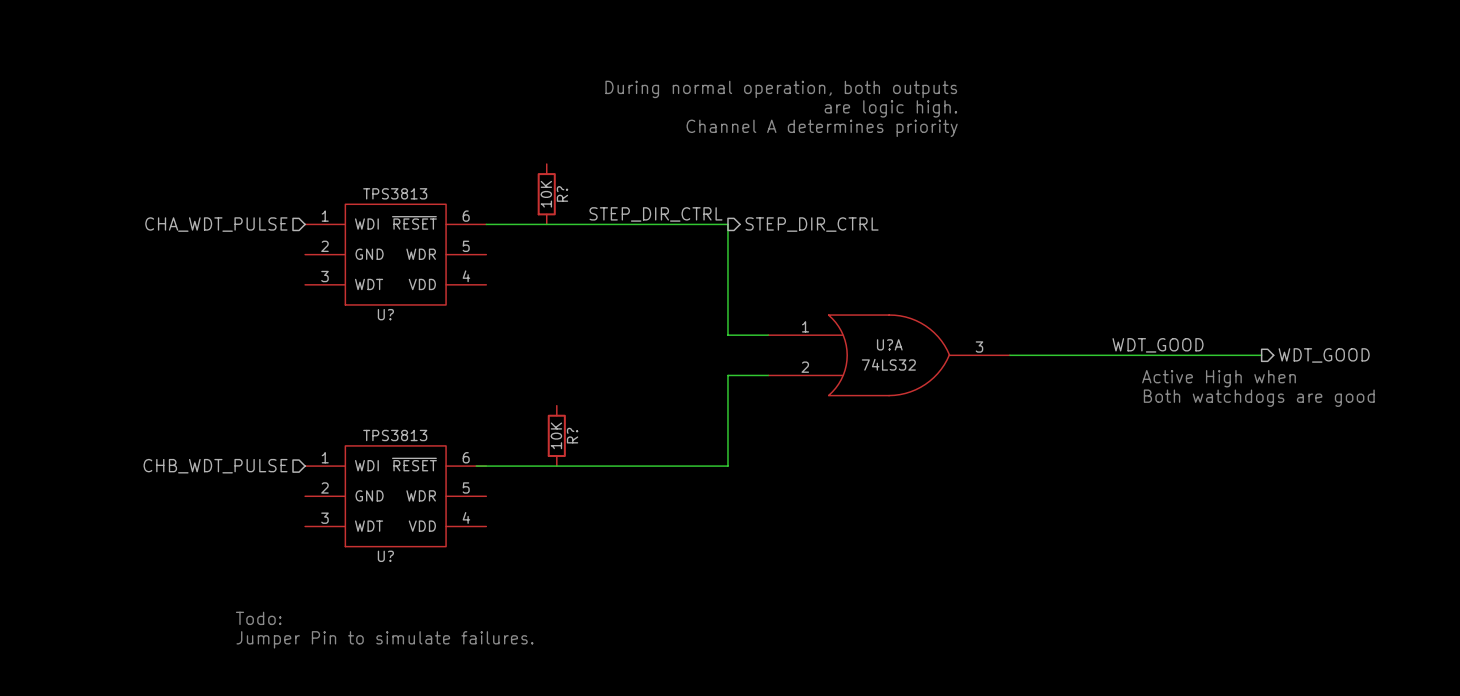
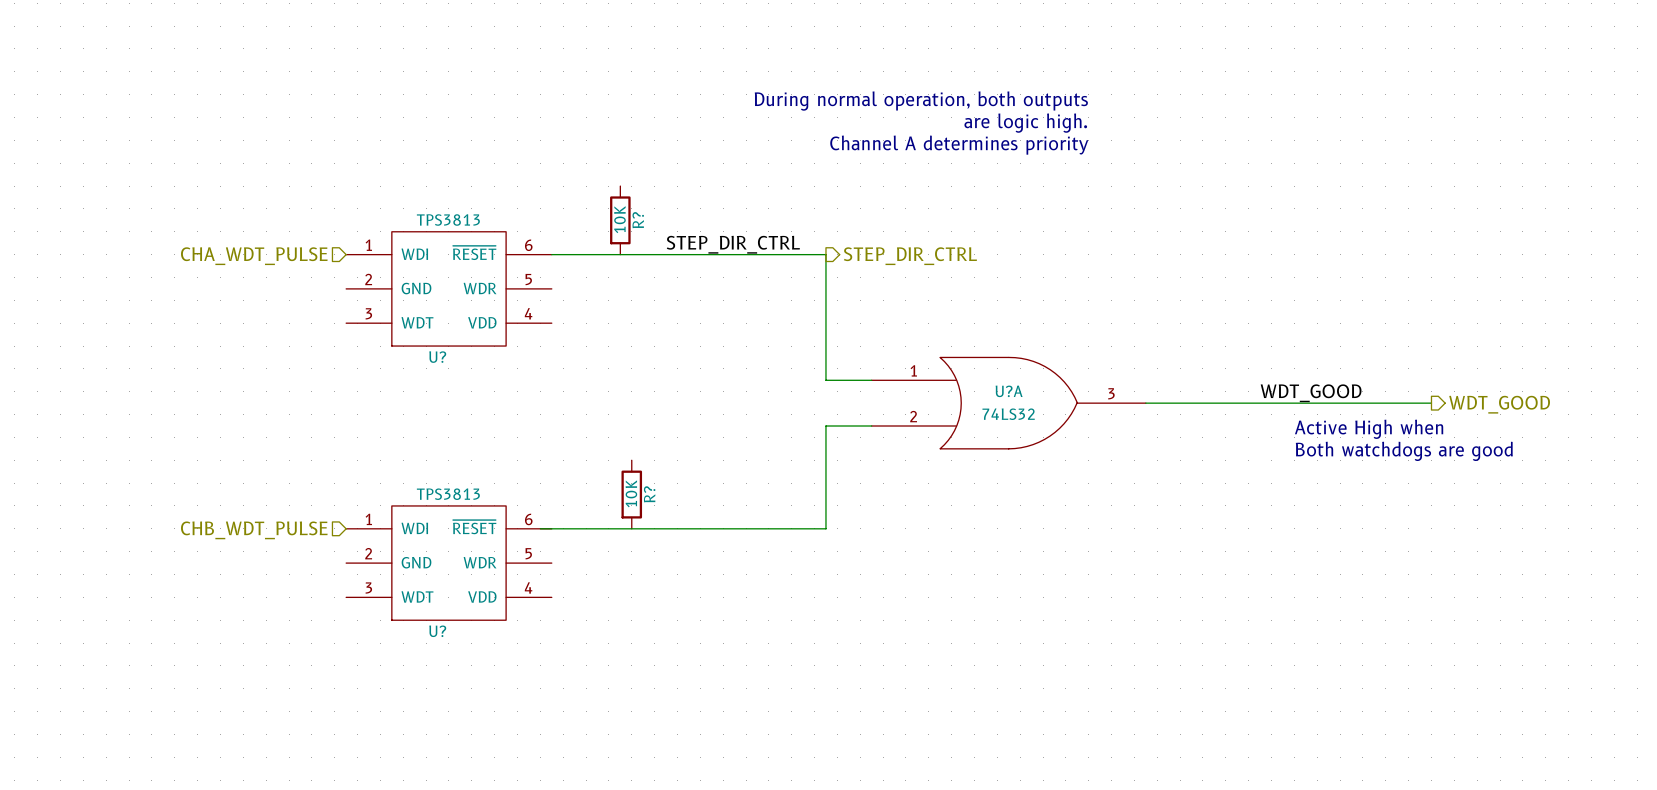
text: Todo: (258, 618) -> none
text: Jumper Pin to simulate failures. (384, 639) -> none

